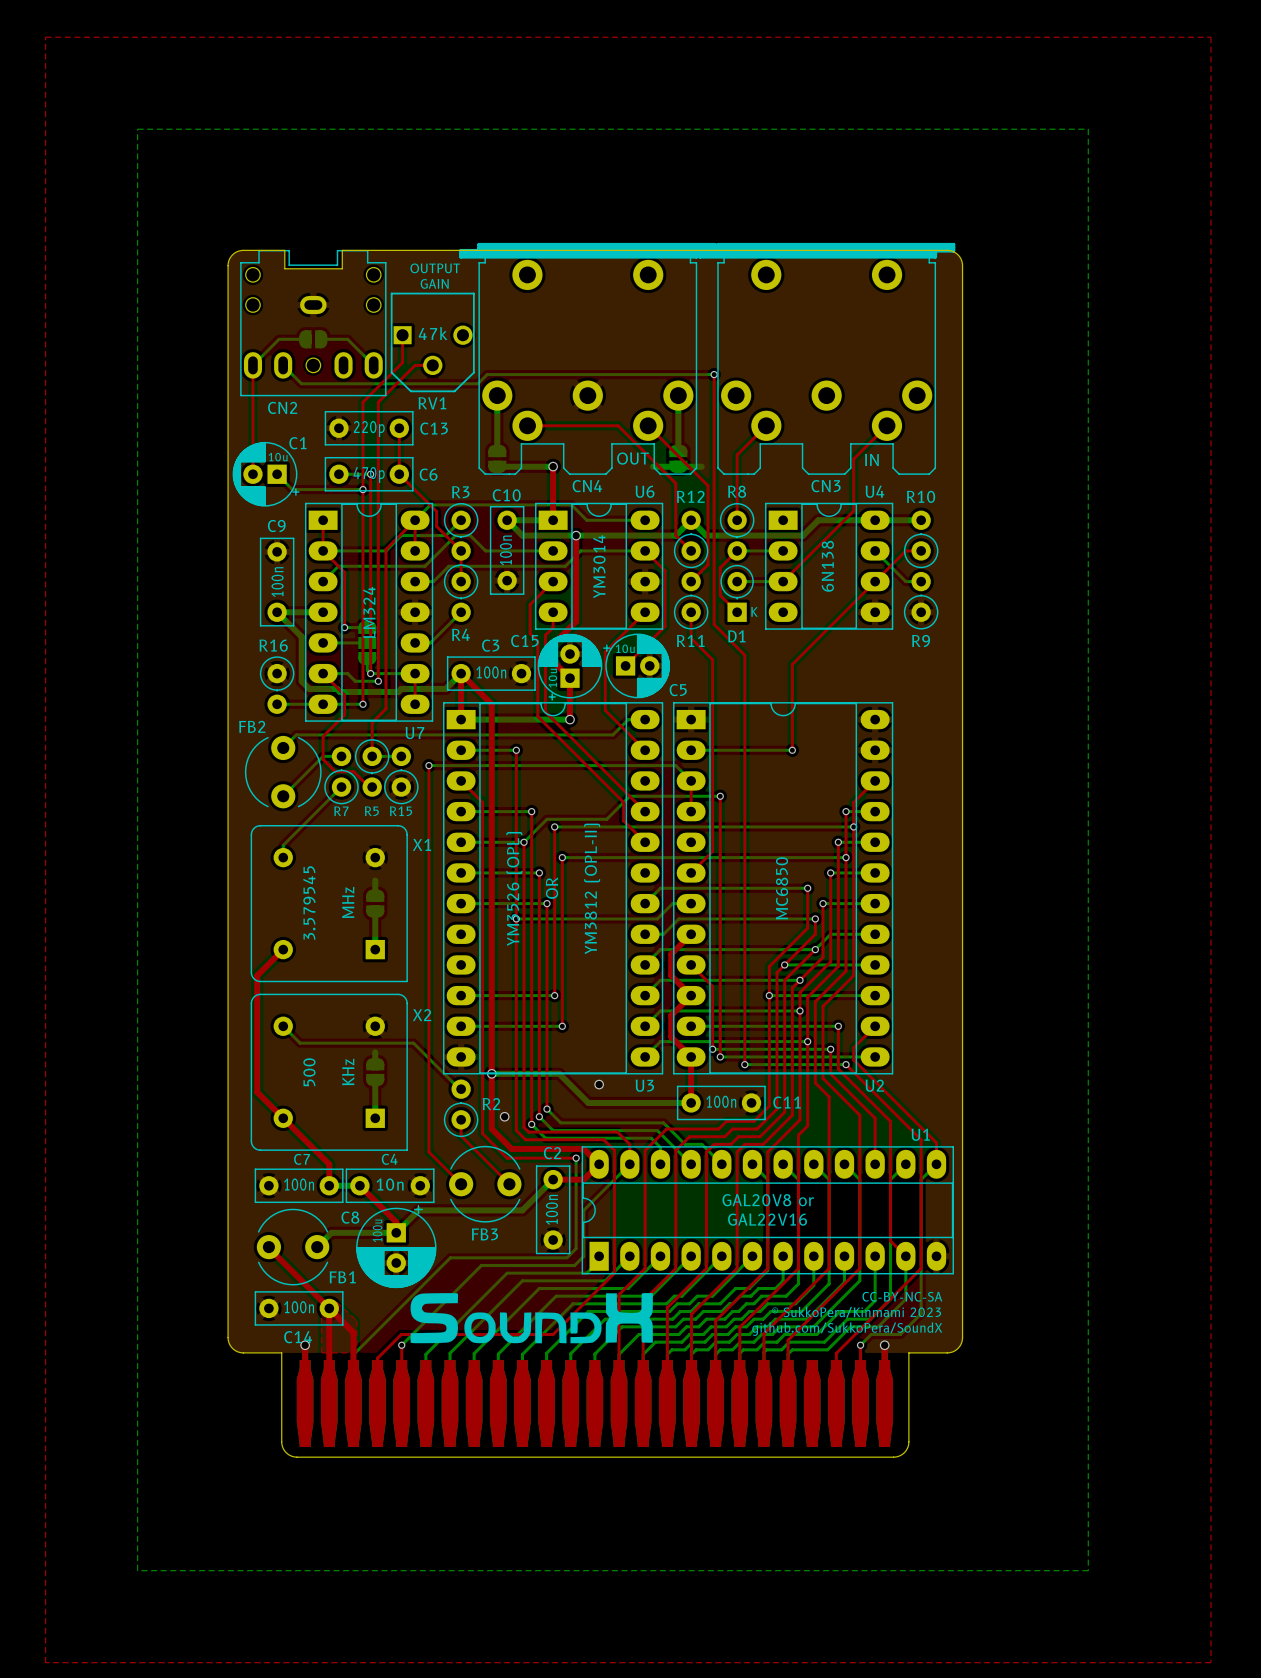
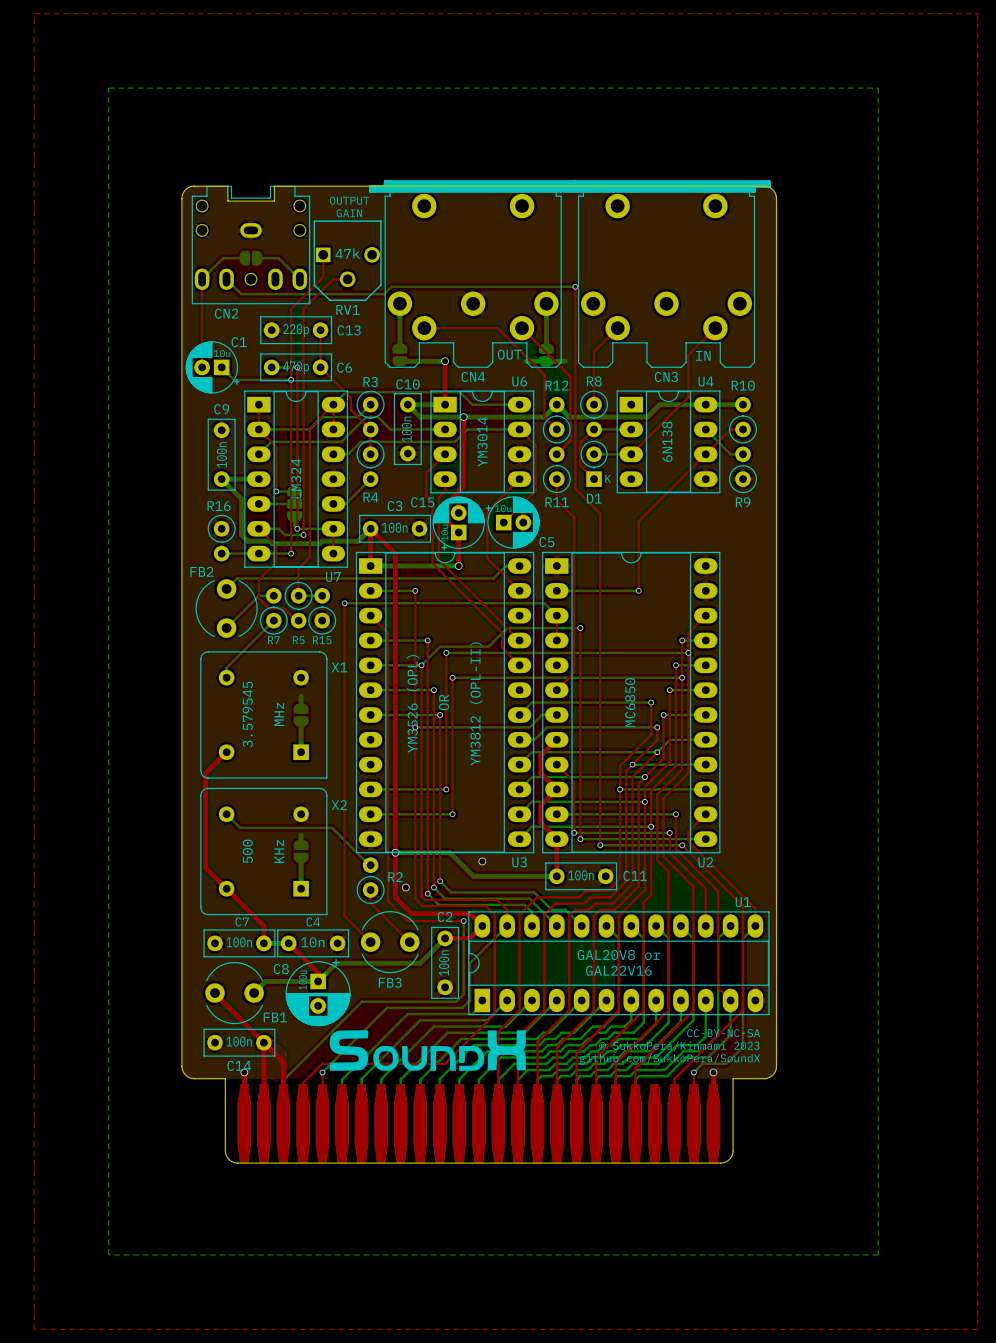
part footprint: [296, 1360, 893, 1447] -> [237, 1084, 721, 1163]

